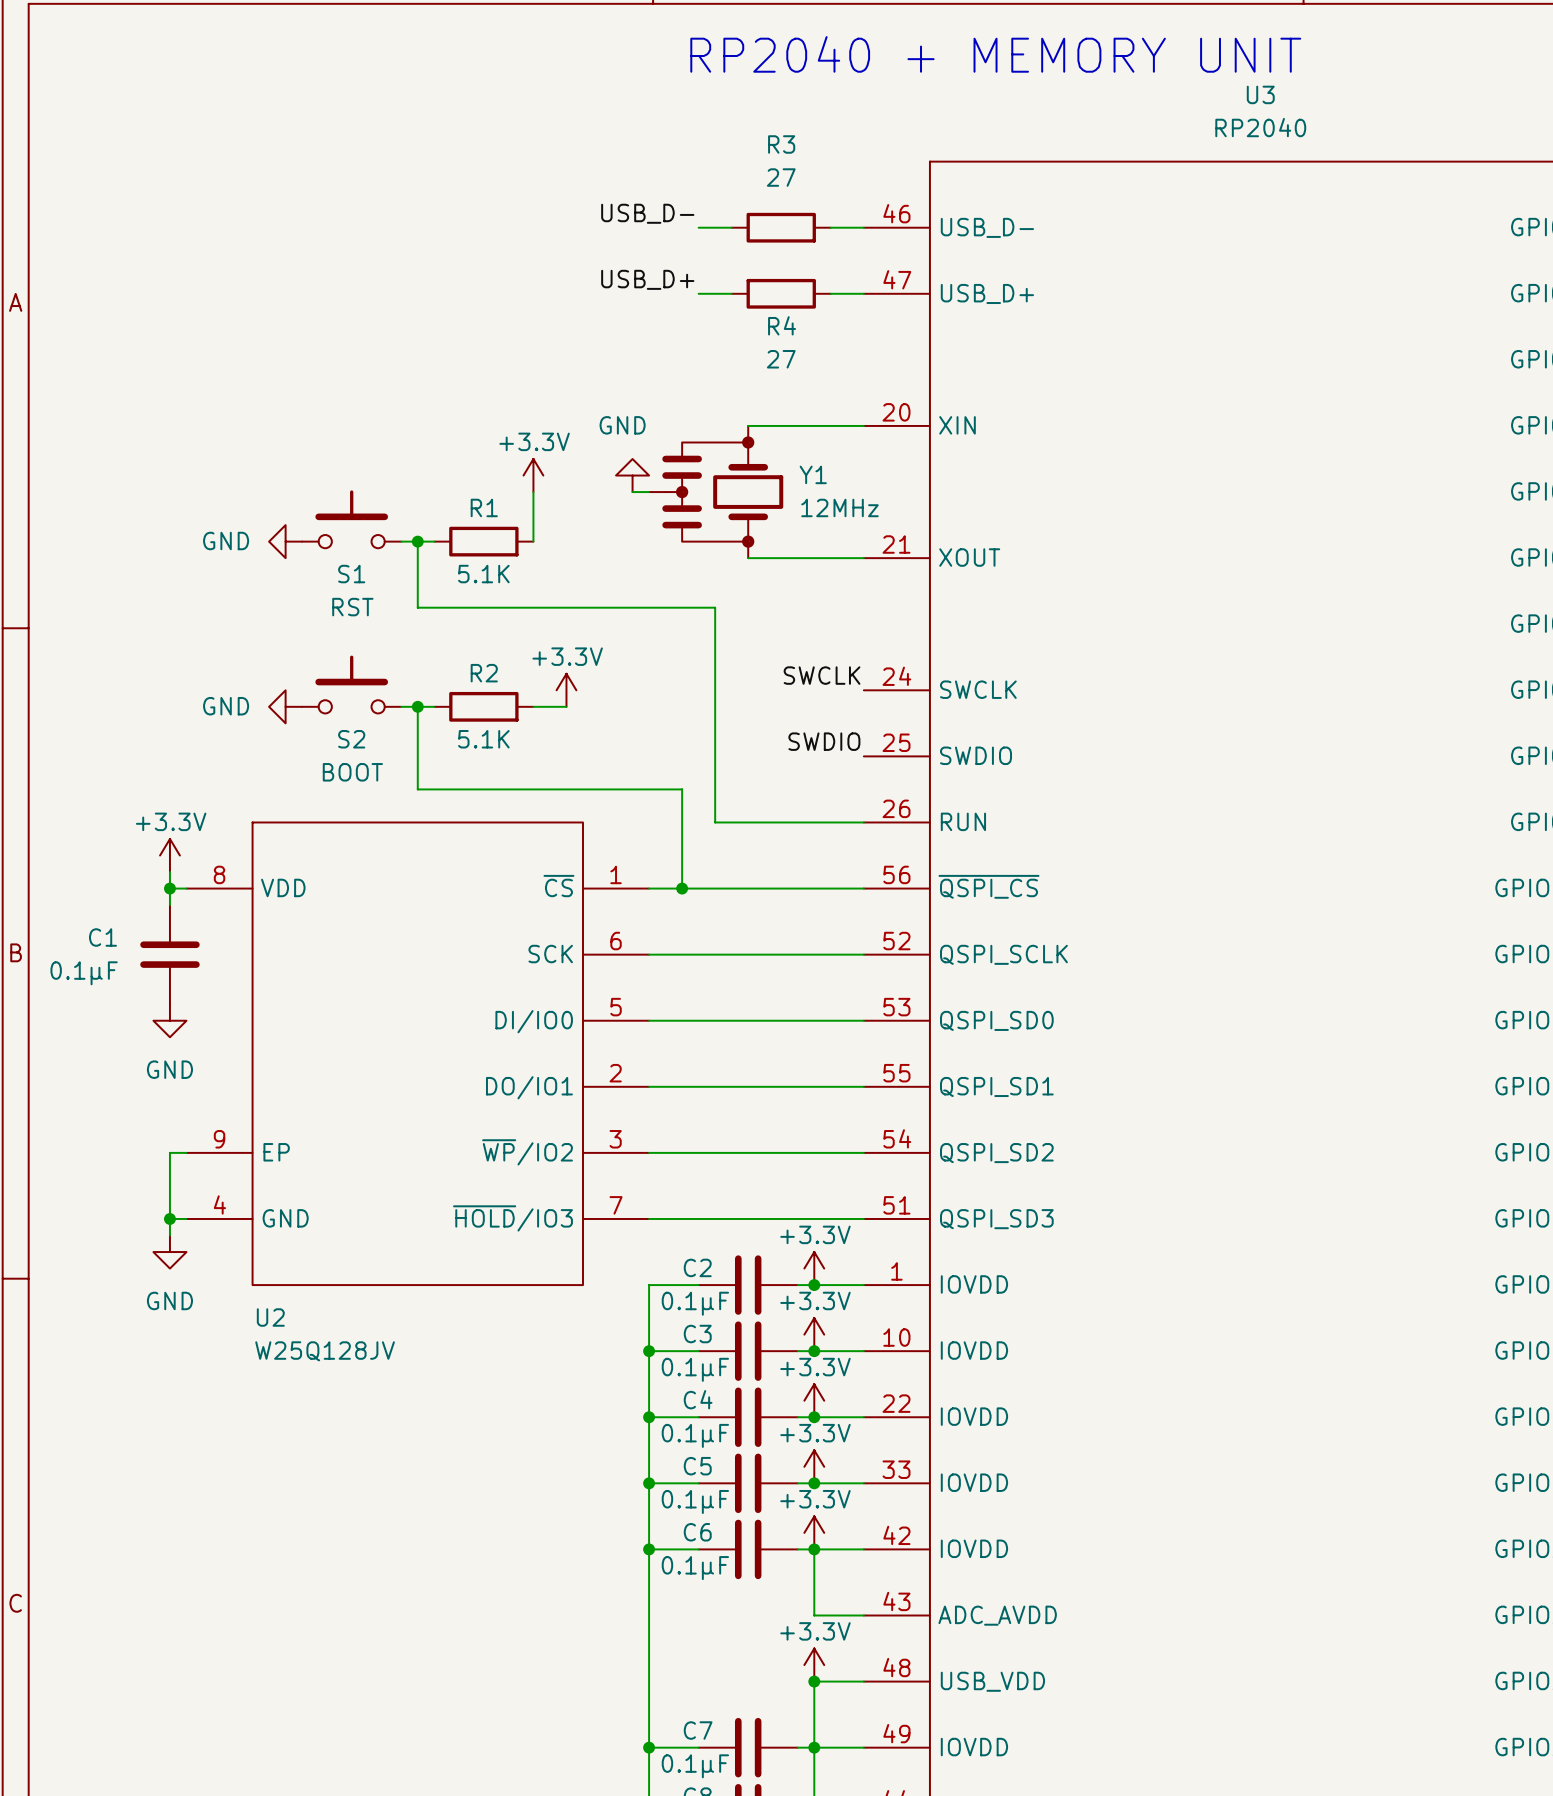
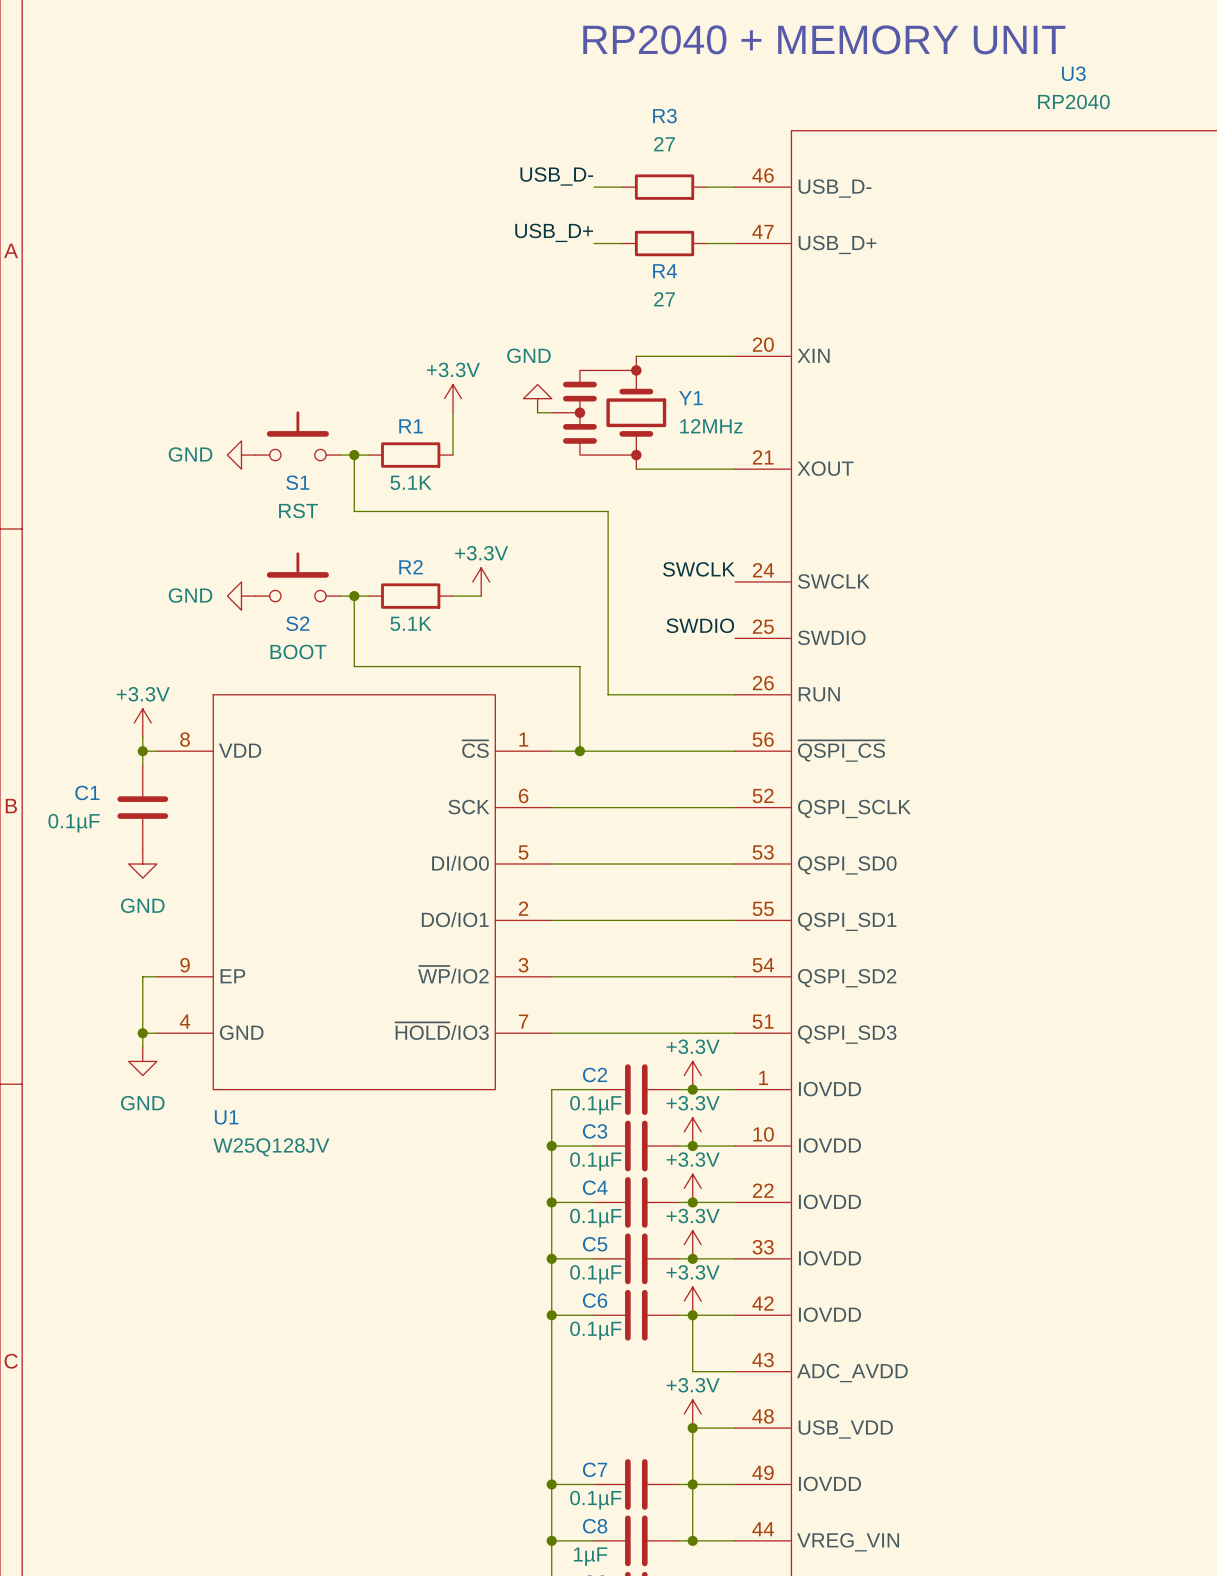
U2 name: U2 (270, 1317) -> U1 (226, 1117)

